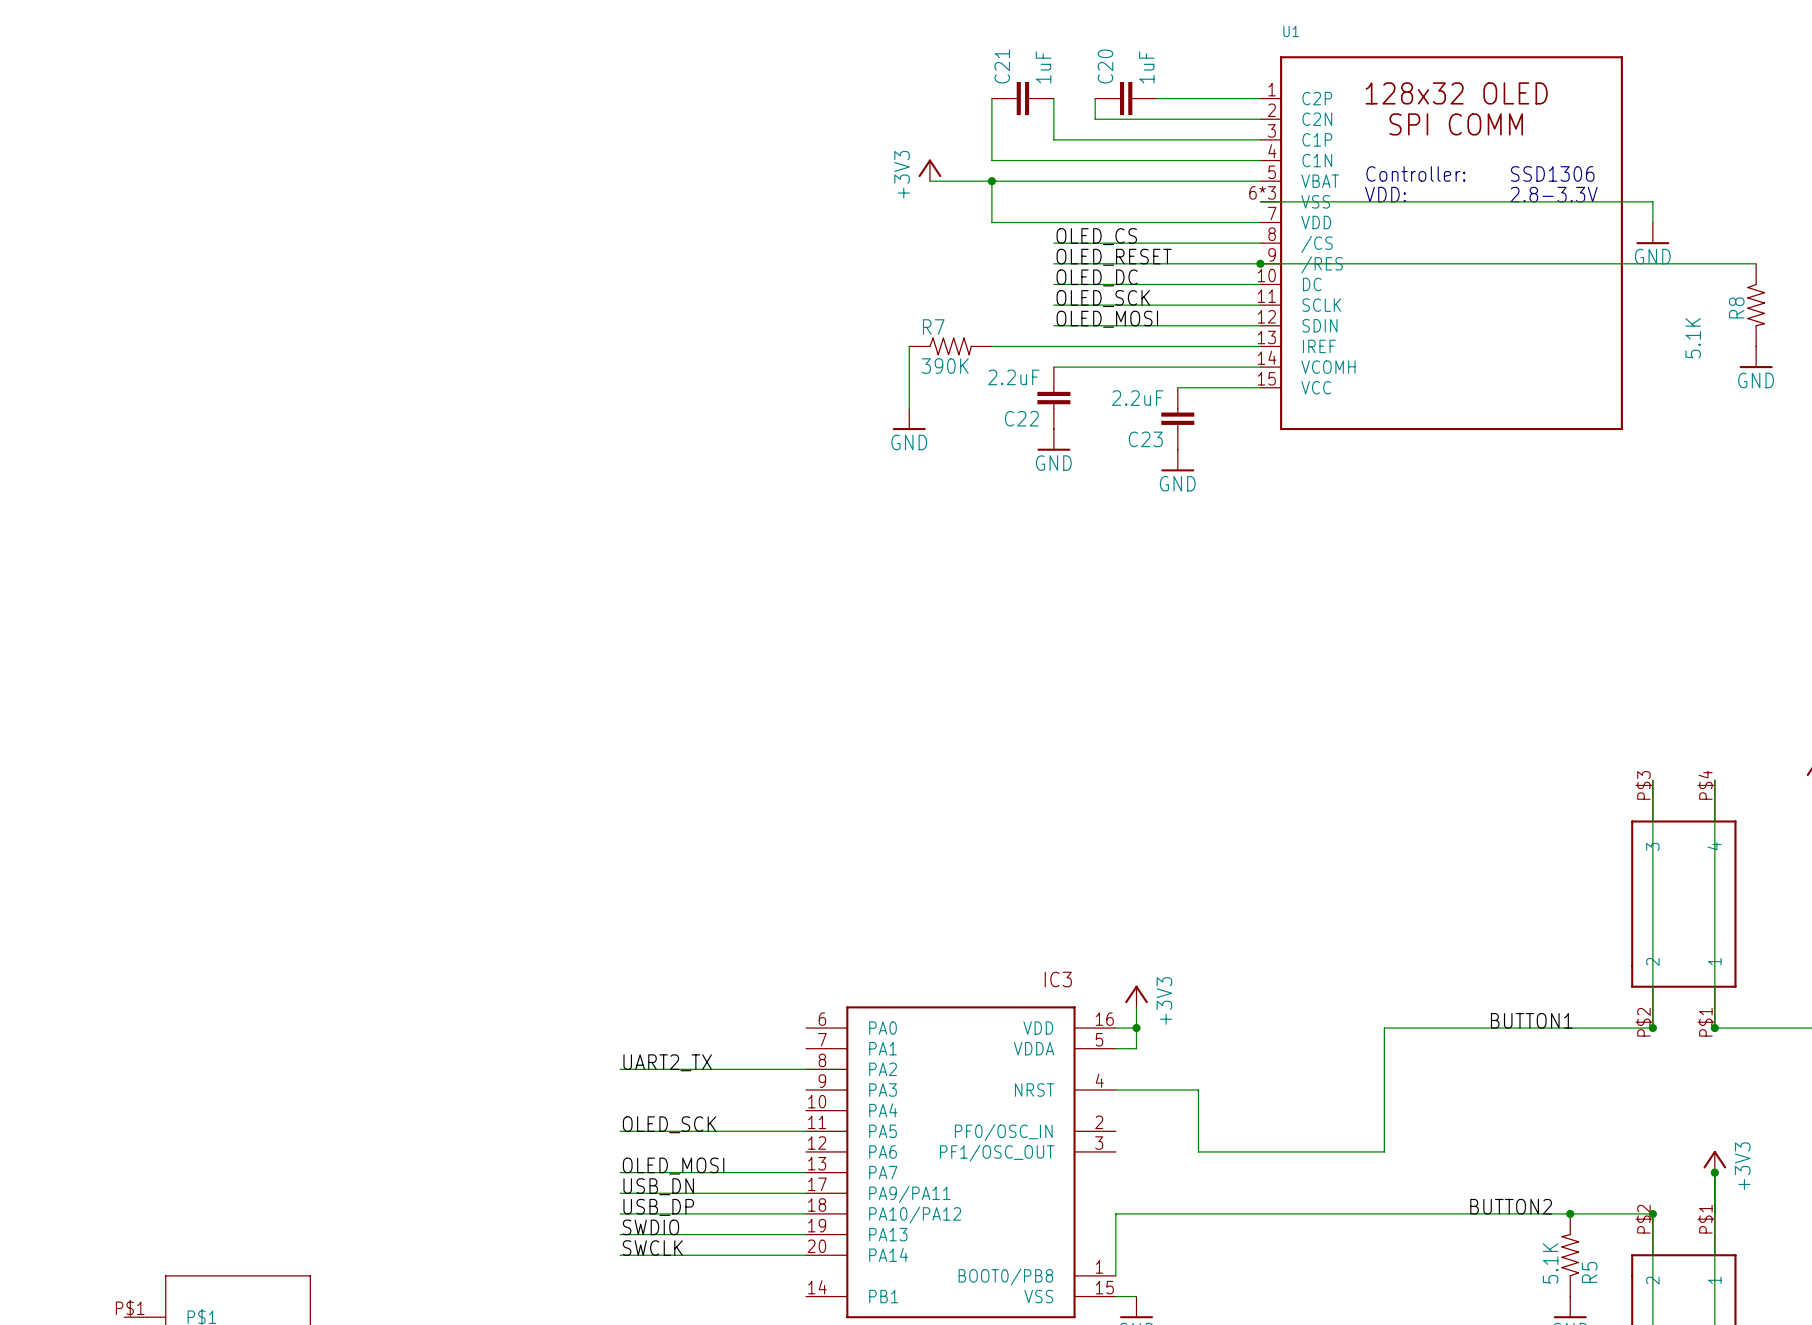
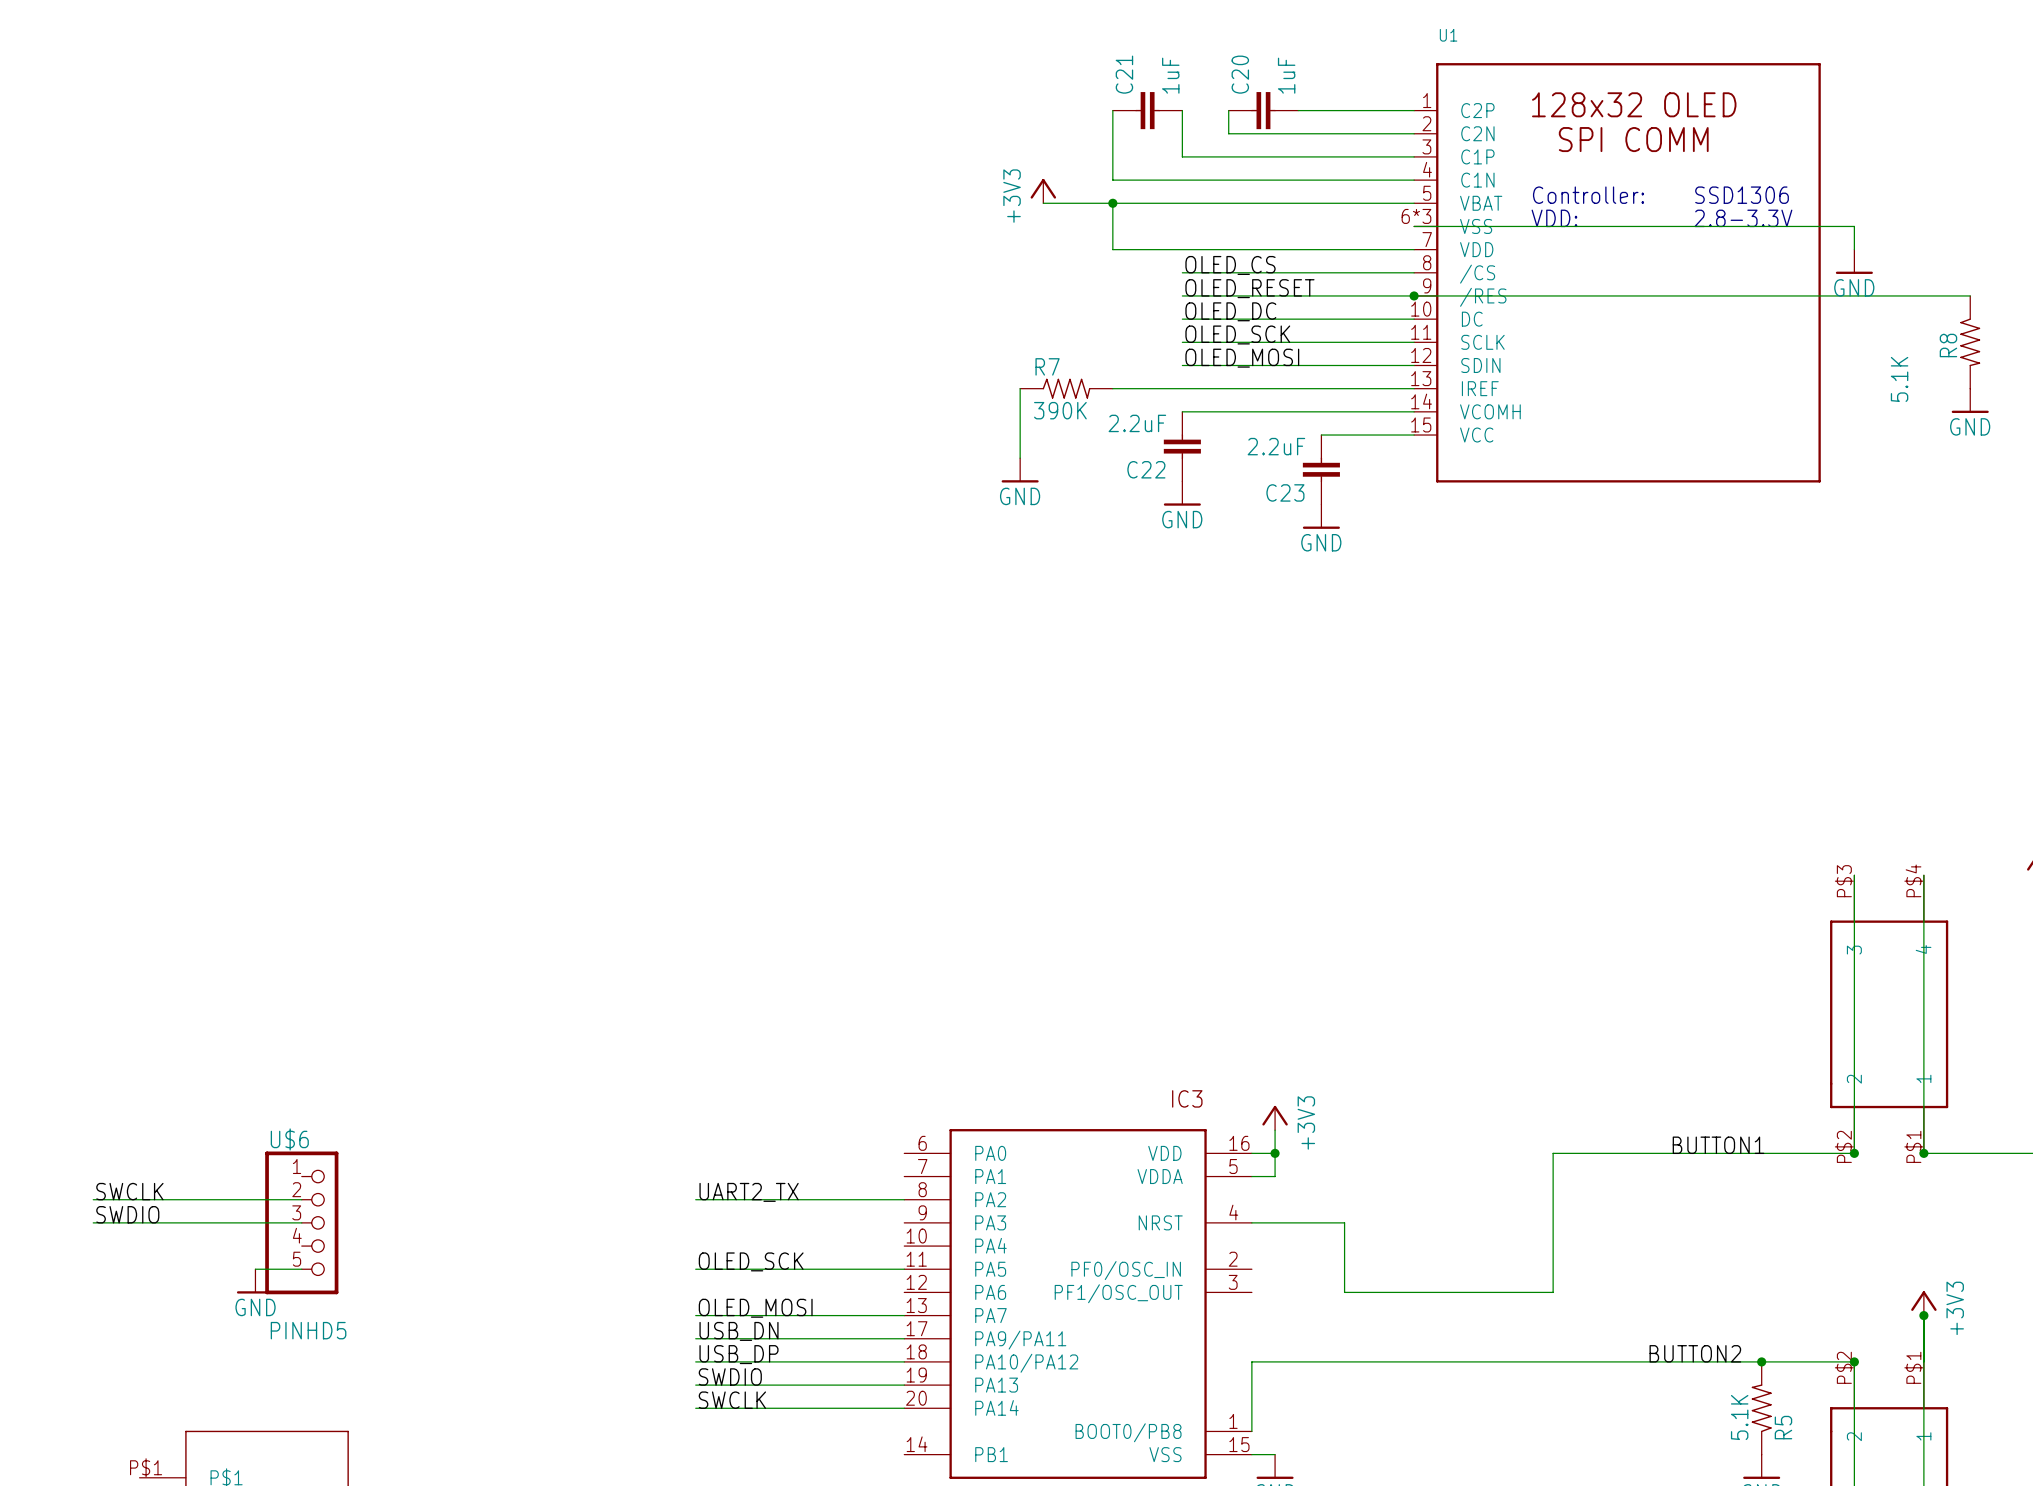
label: none -> SWCLK (129, 1191)
wire: none -> (93, 1199) (301, 1199)
label: none -> SWDIO (127, 1214)
wire: none -> (93, 1222) (301, 1222)
U$6: none -> PINHD5 (301, 1222)
wire: none -> (255, 1269) (301, 1269)
power symbol: none -> GND (255, 1281)

